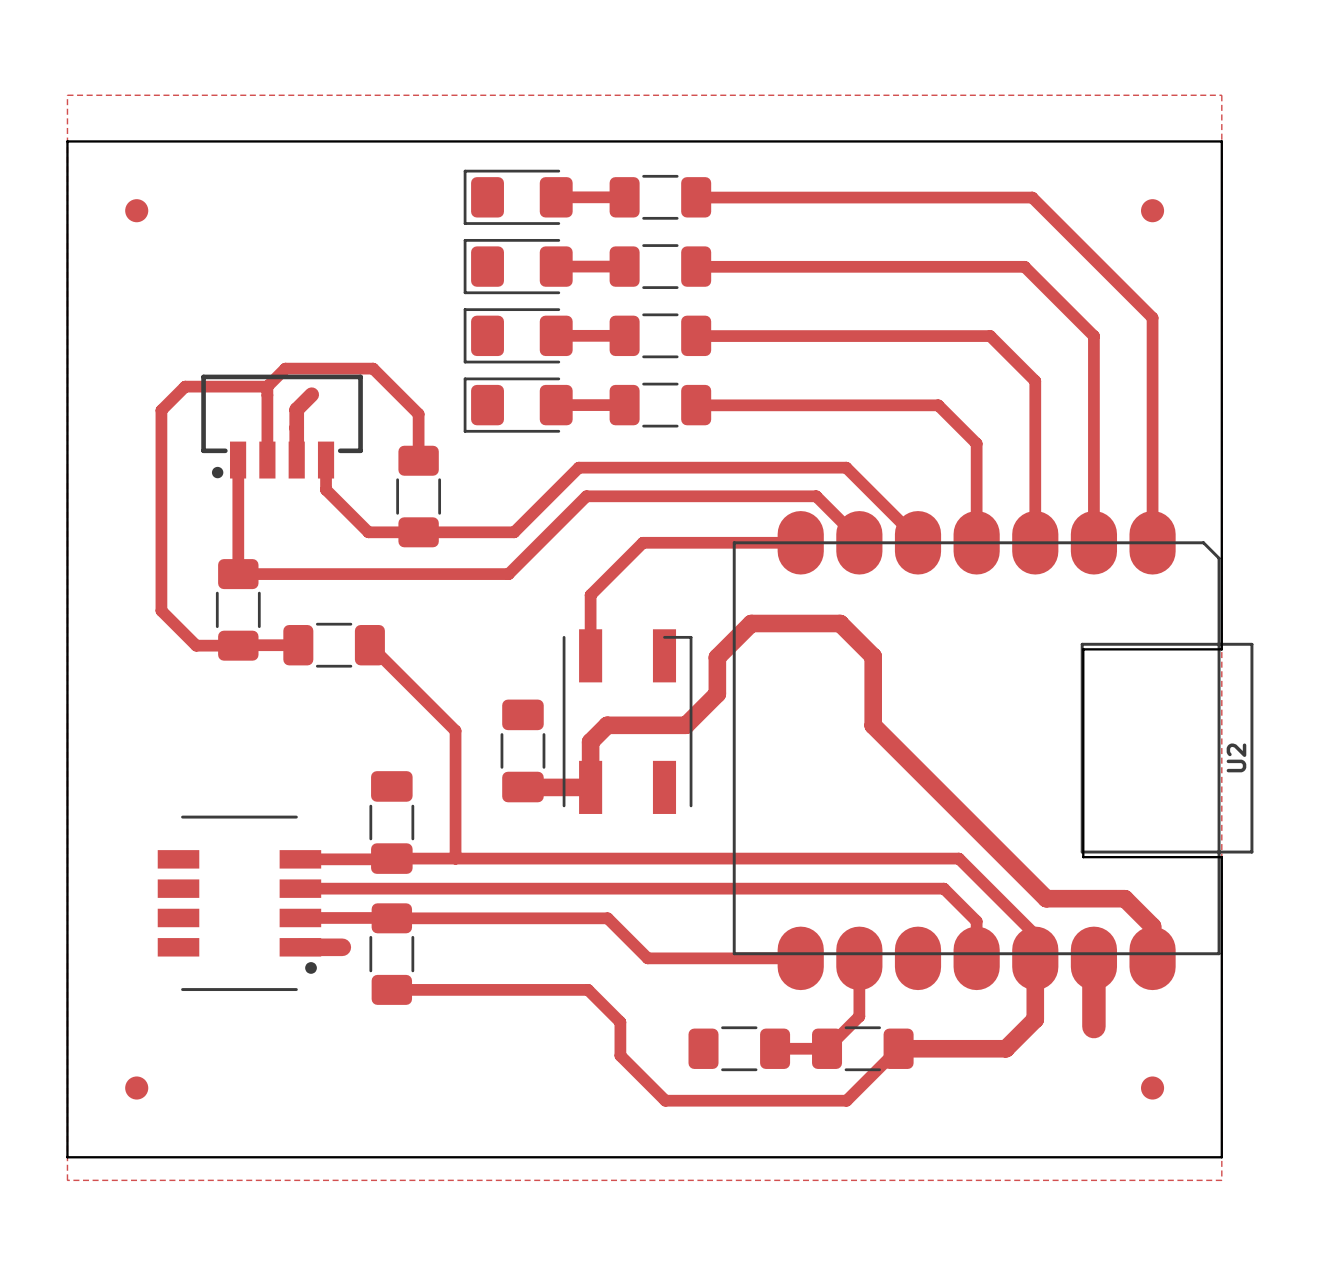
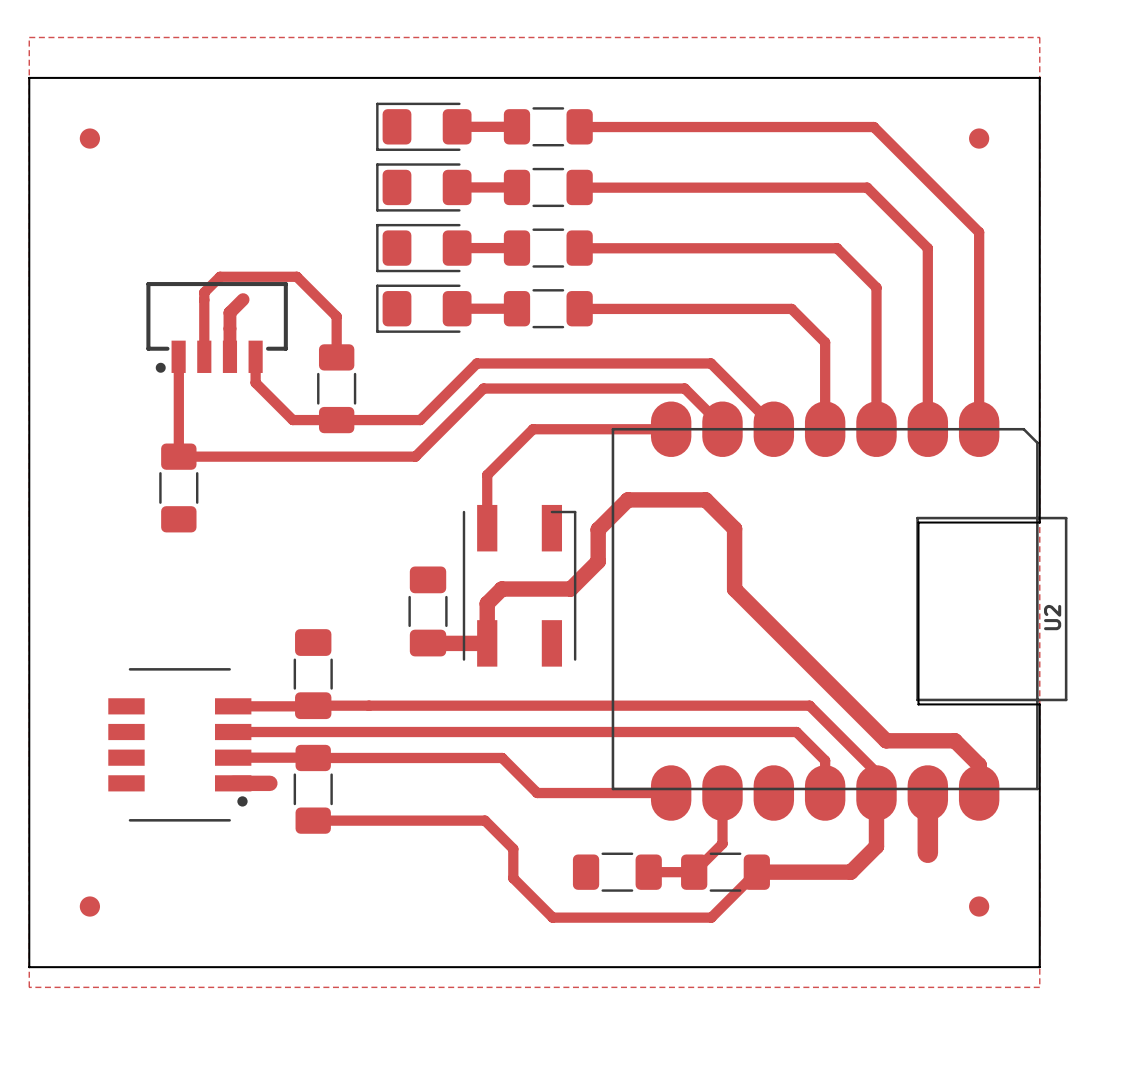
top track: (267, 386) (185, 386) (161, 410) (161, 610) (196, 645) (298, 645) -> none
part: (334, 645) -> none
top track: (369, 645) (455, 730) (455, 858) -> none

